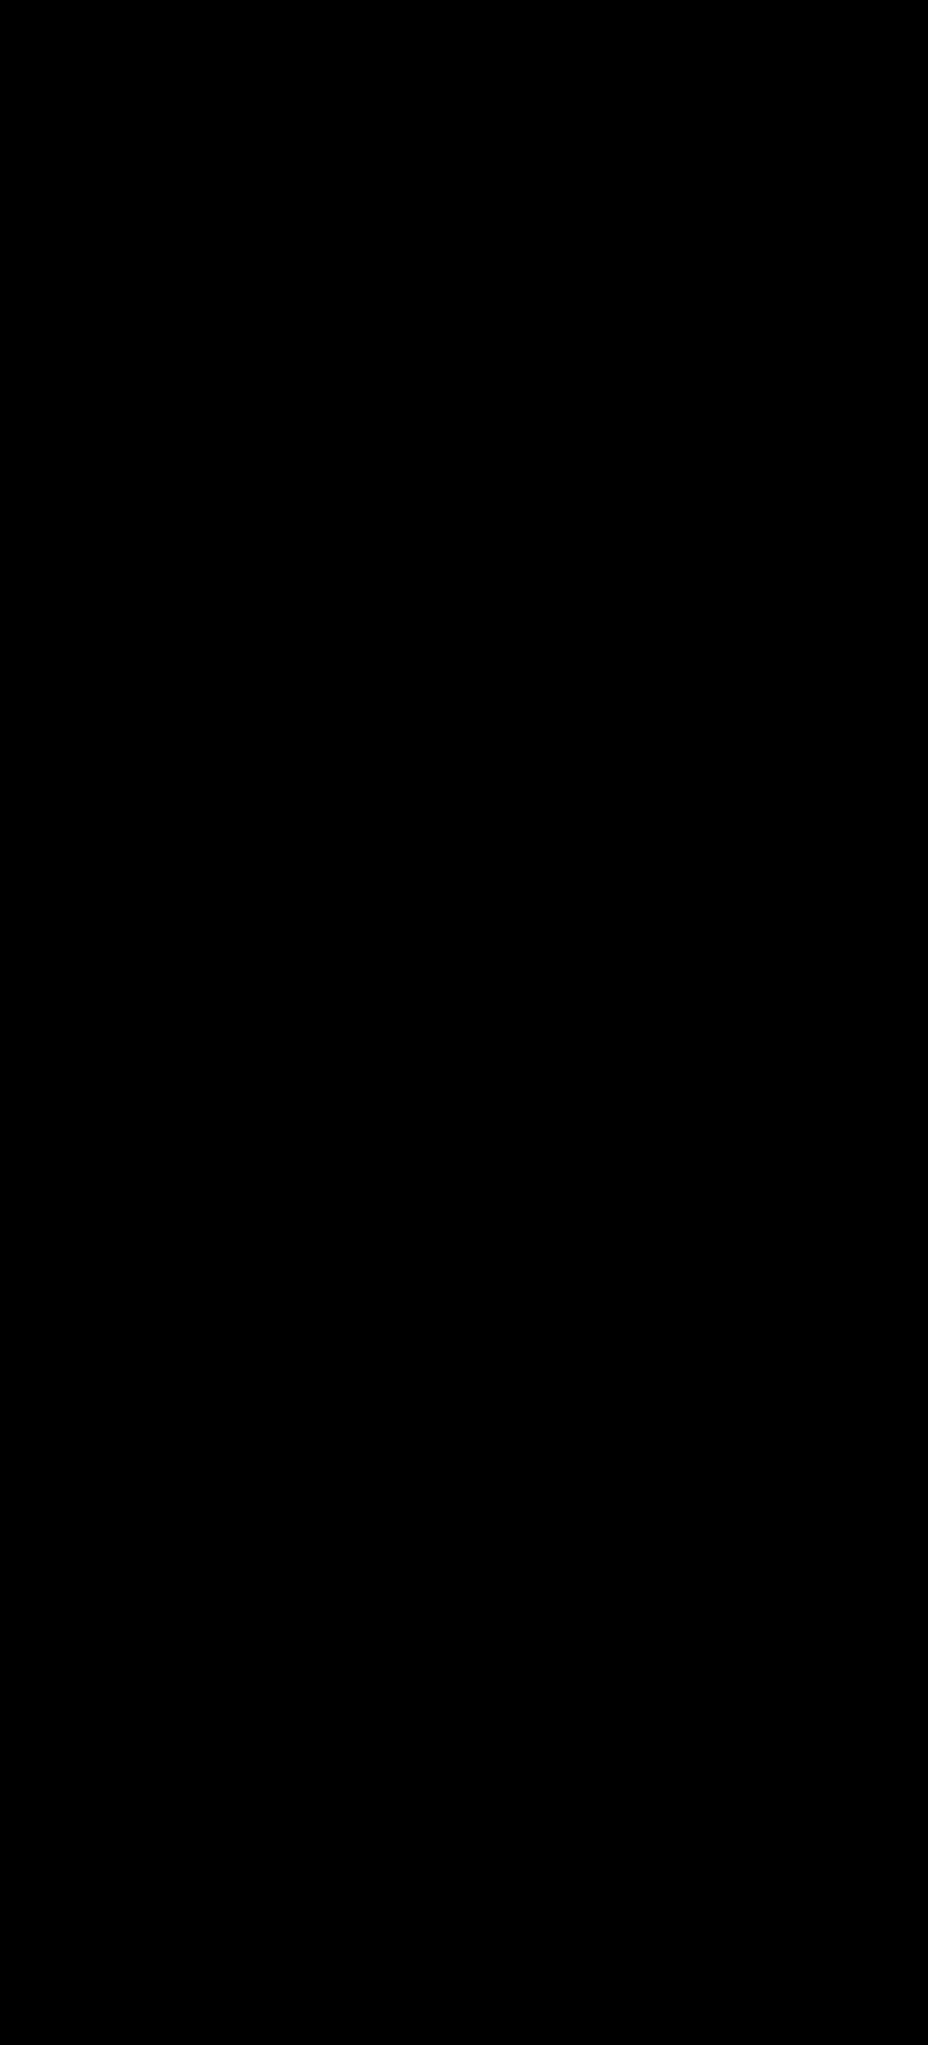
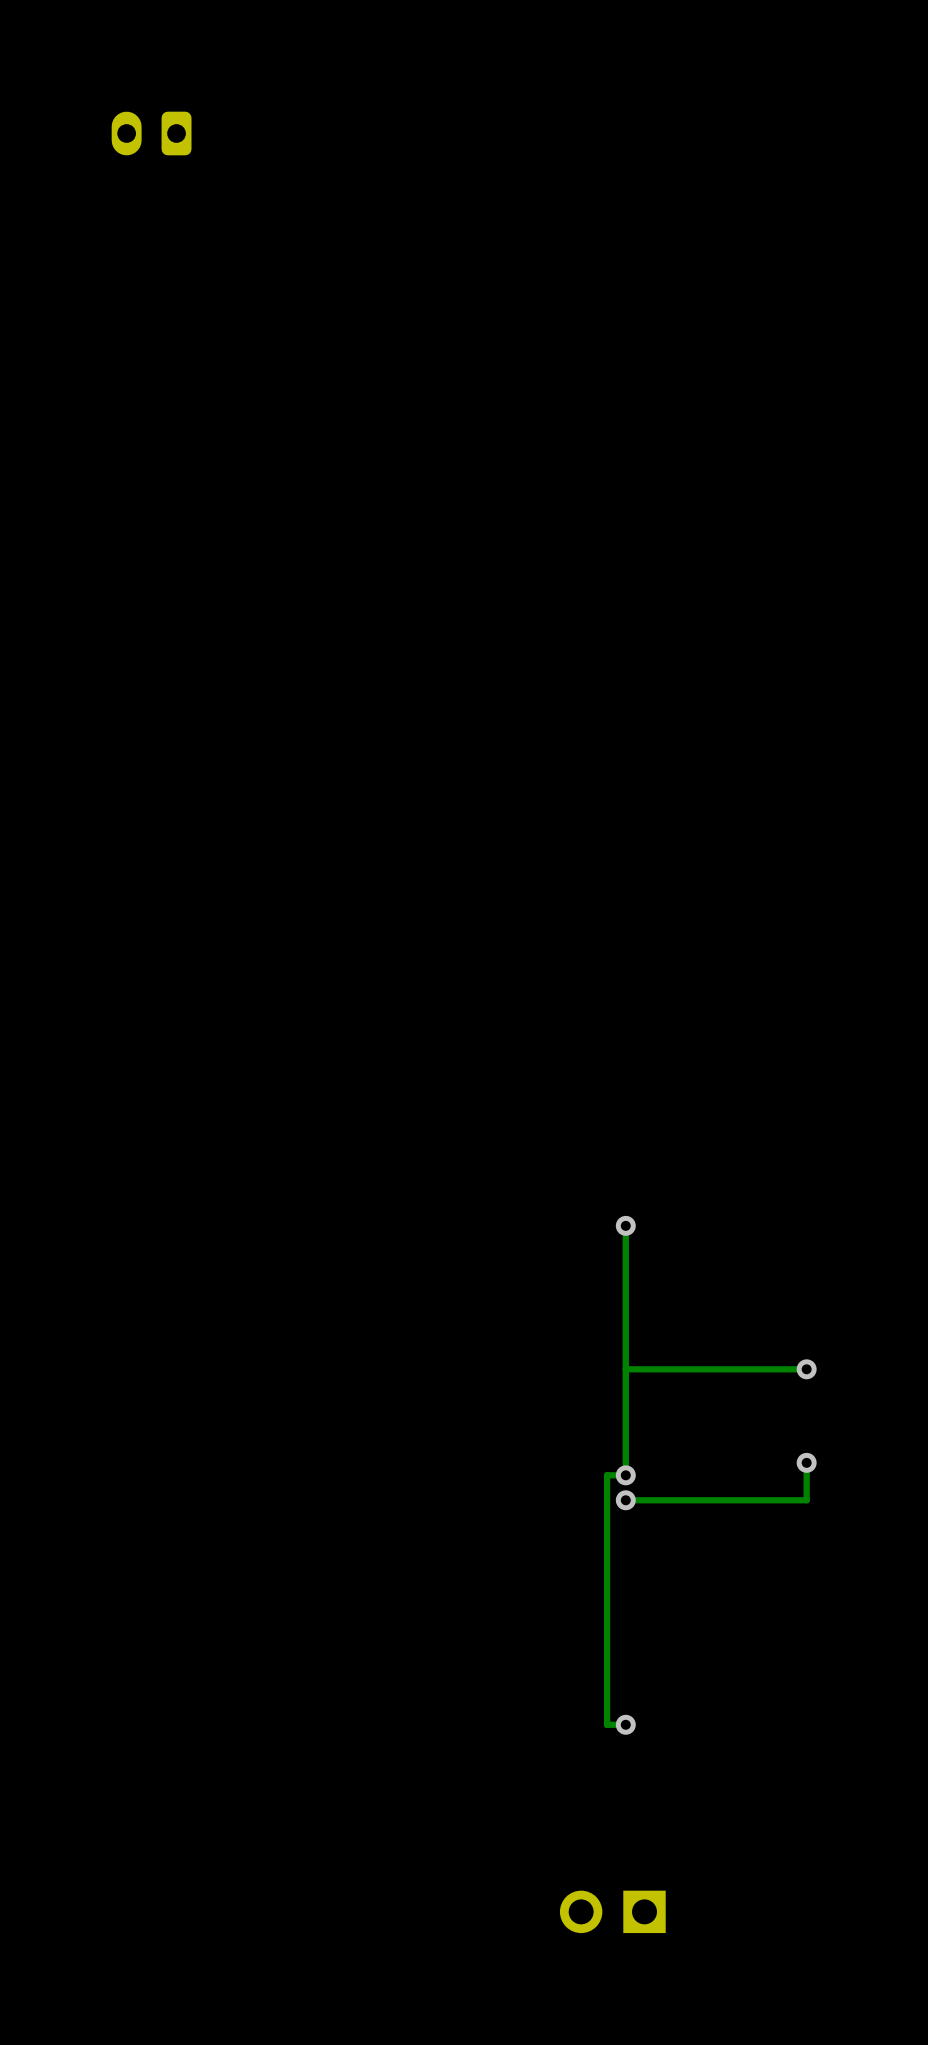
part: none -> (151, 133)
track: none -> (625, 1225) (625, 1475) (607, 1475) (607, 1724) (625, 1724)
via: none -> (625, 1225)
track: none -> (806, 1369) (625, 1369)
via: none -> (806, 1369)
track: none -> (806, 1462) (806, 1500) (625, 1500)
via: none -> (806, 1462)
via: none -> (625, 1475)
via: none -> (625, 1500)
via: none -> (625, 1724)
part: none -> (612, 1911)

